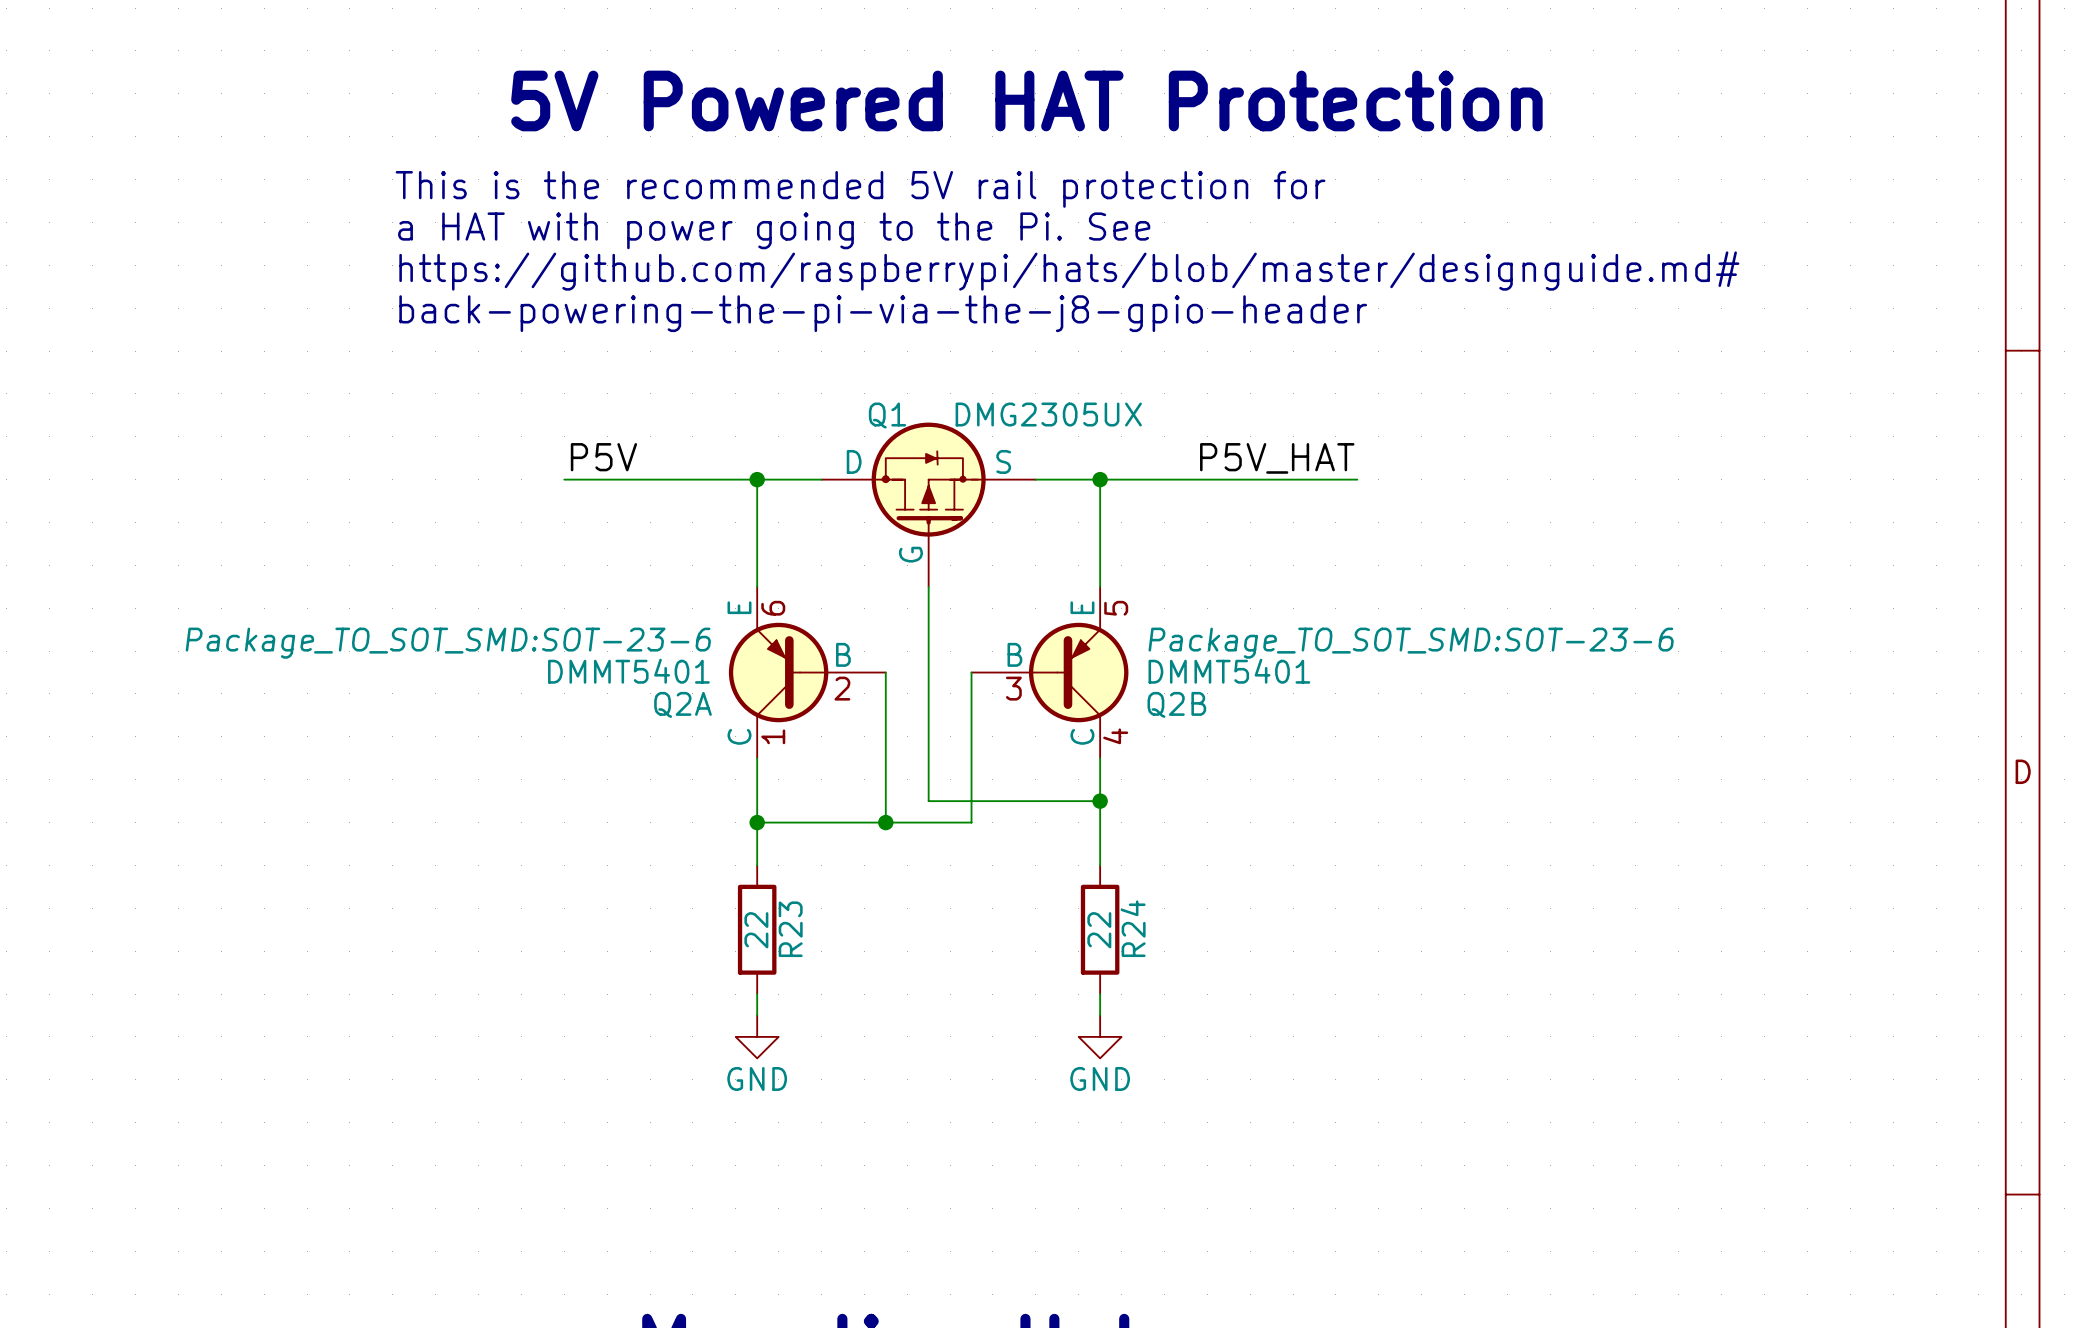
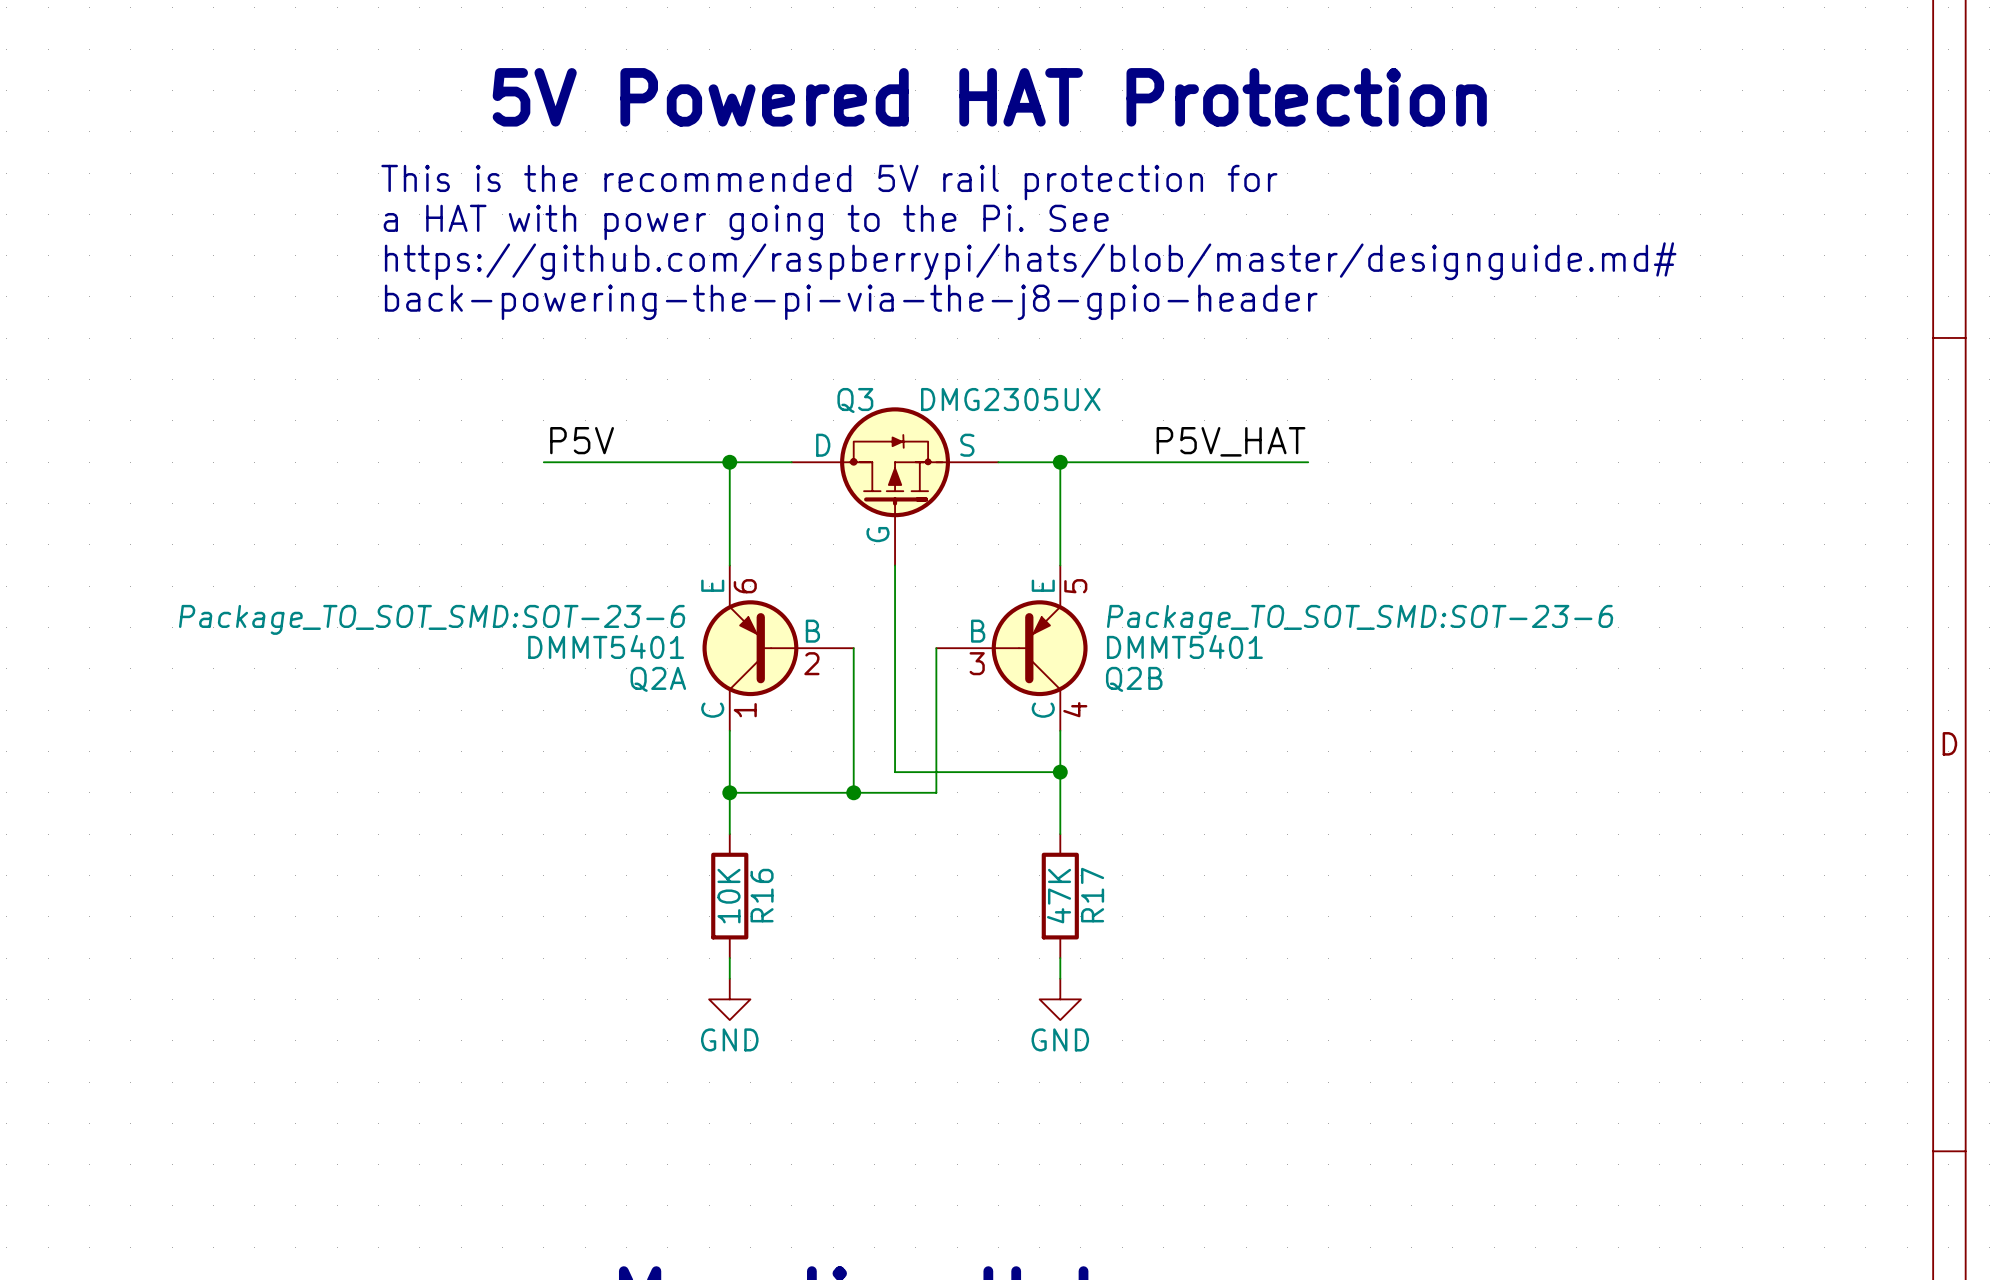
Q1 name: Q1 (887, 415) -> Q3 (855, 400)
R24 name: R24 (1133, 928) -> R17 (1092, 895)
R23 name: R23 (790, 929) -> R16 (762, 895)
R23 value: 22 (756, 930) -> 10K (729, 896)
R24 value: 22 (1099, 930) -> 47K (1059, 896)

